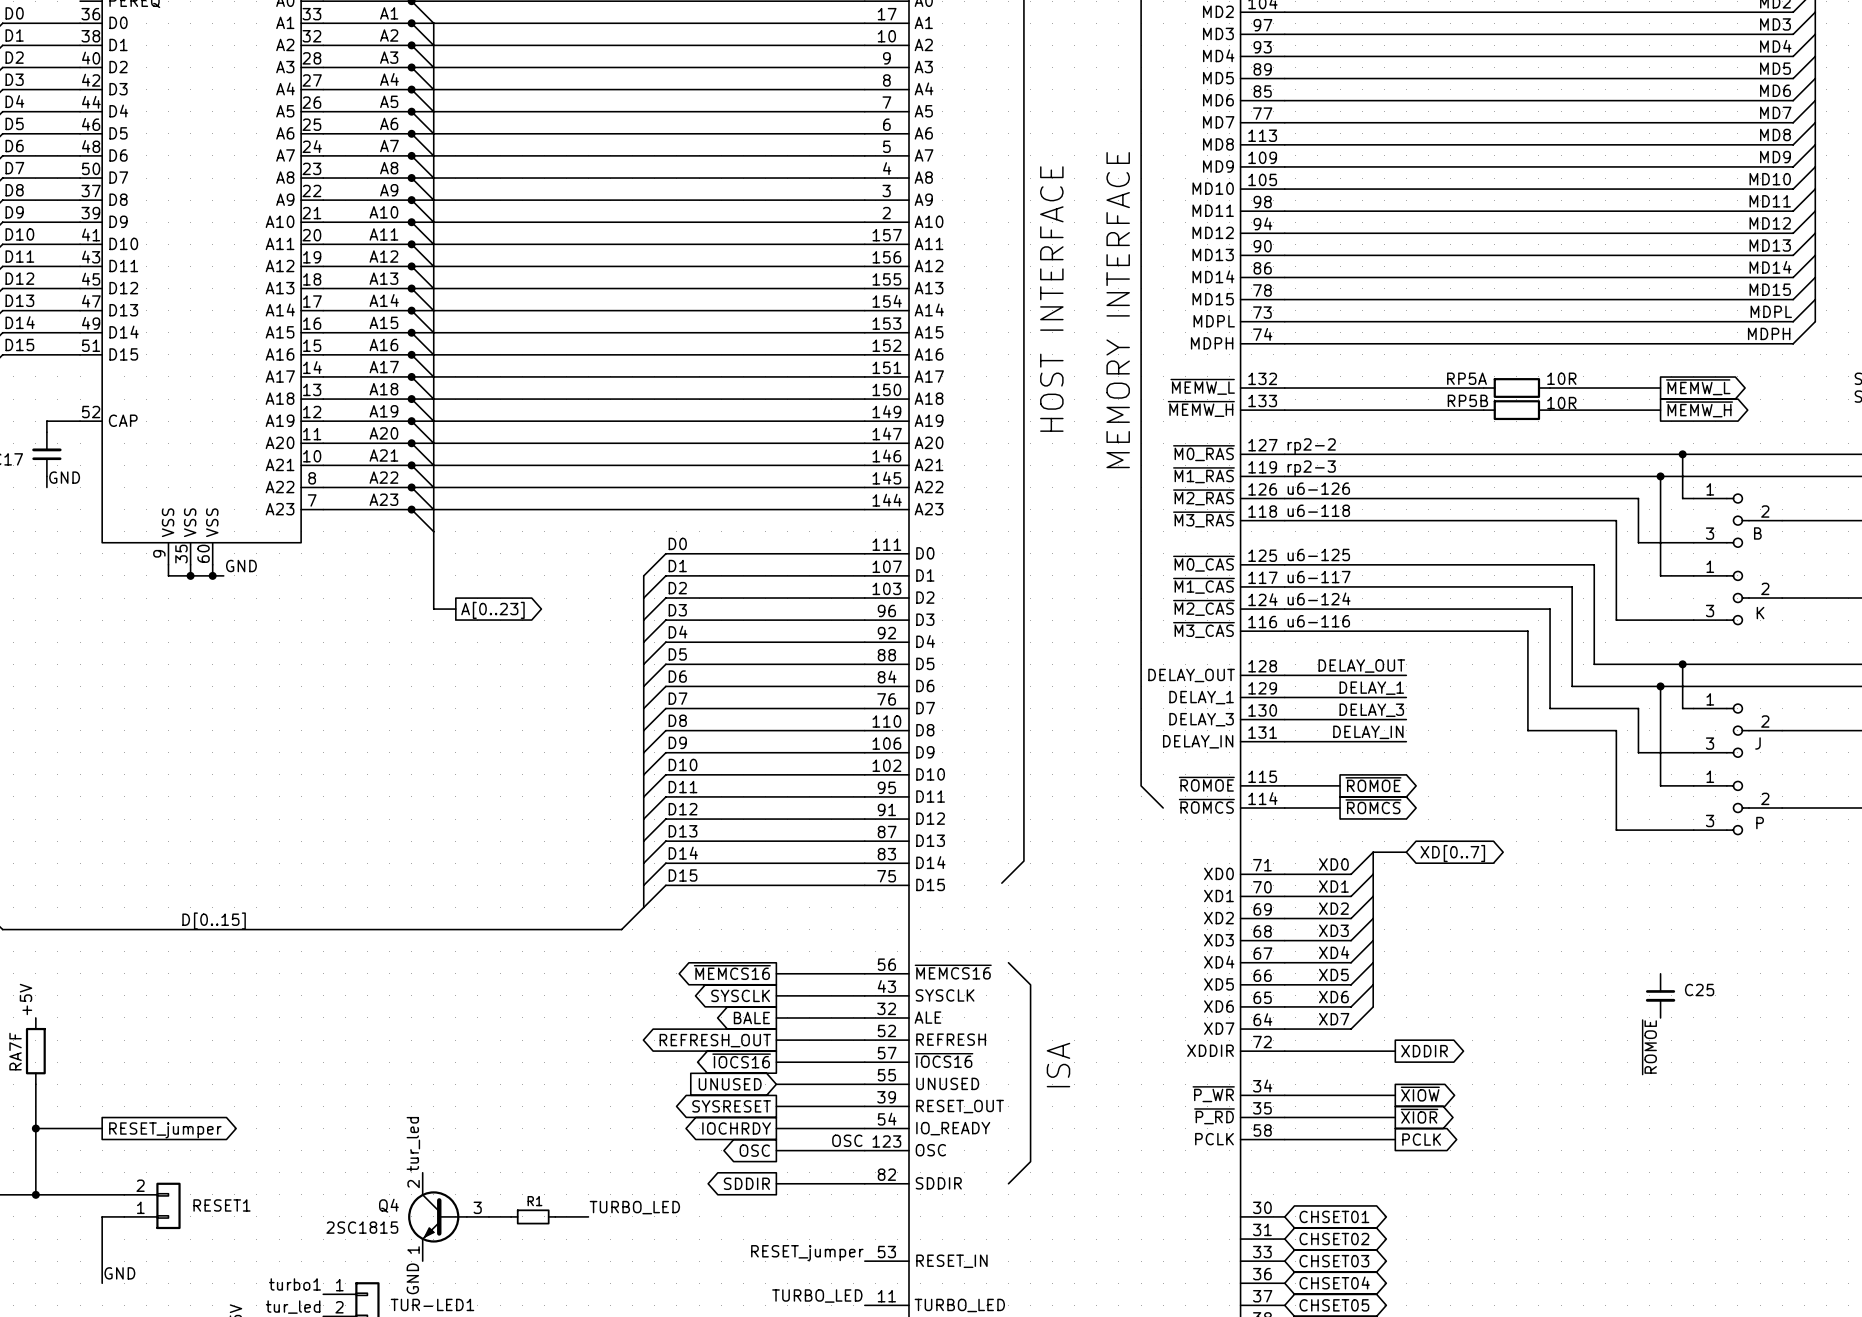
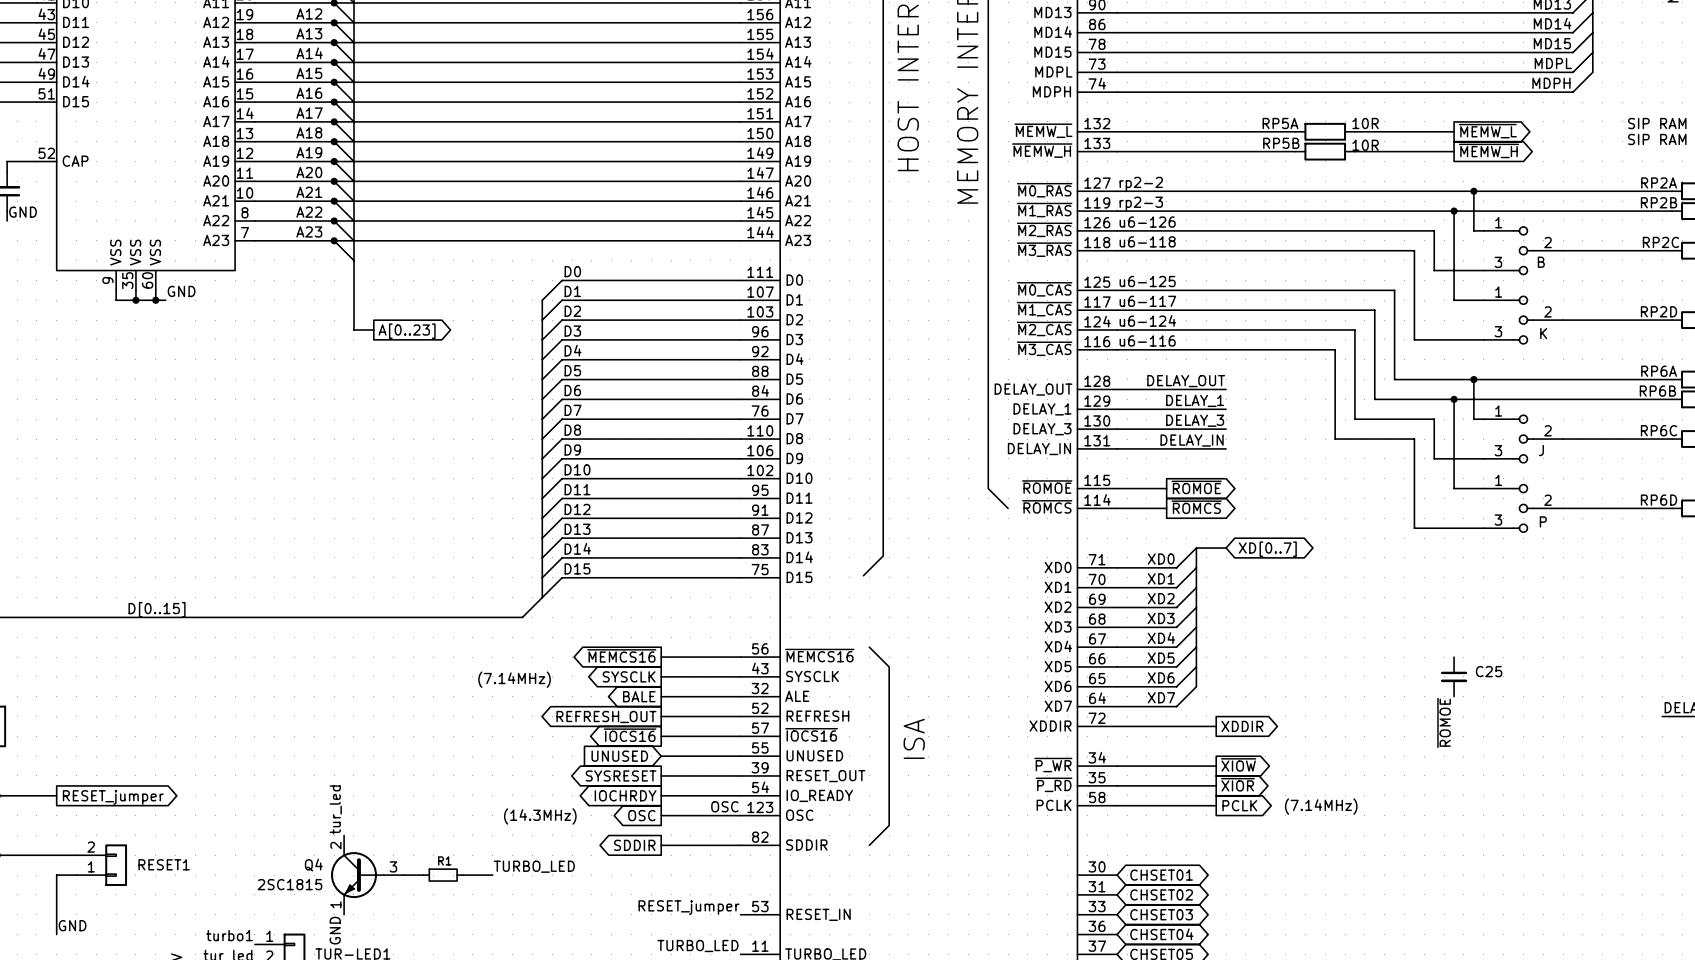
text: none -> (7.14MHz) (514, 679)
text: none -> (7.14MHz) (1321, 806)
text: none -> (14.3MHz) (540, 816)

